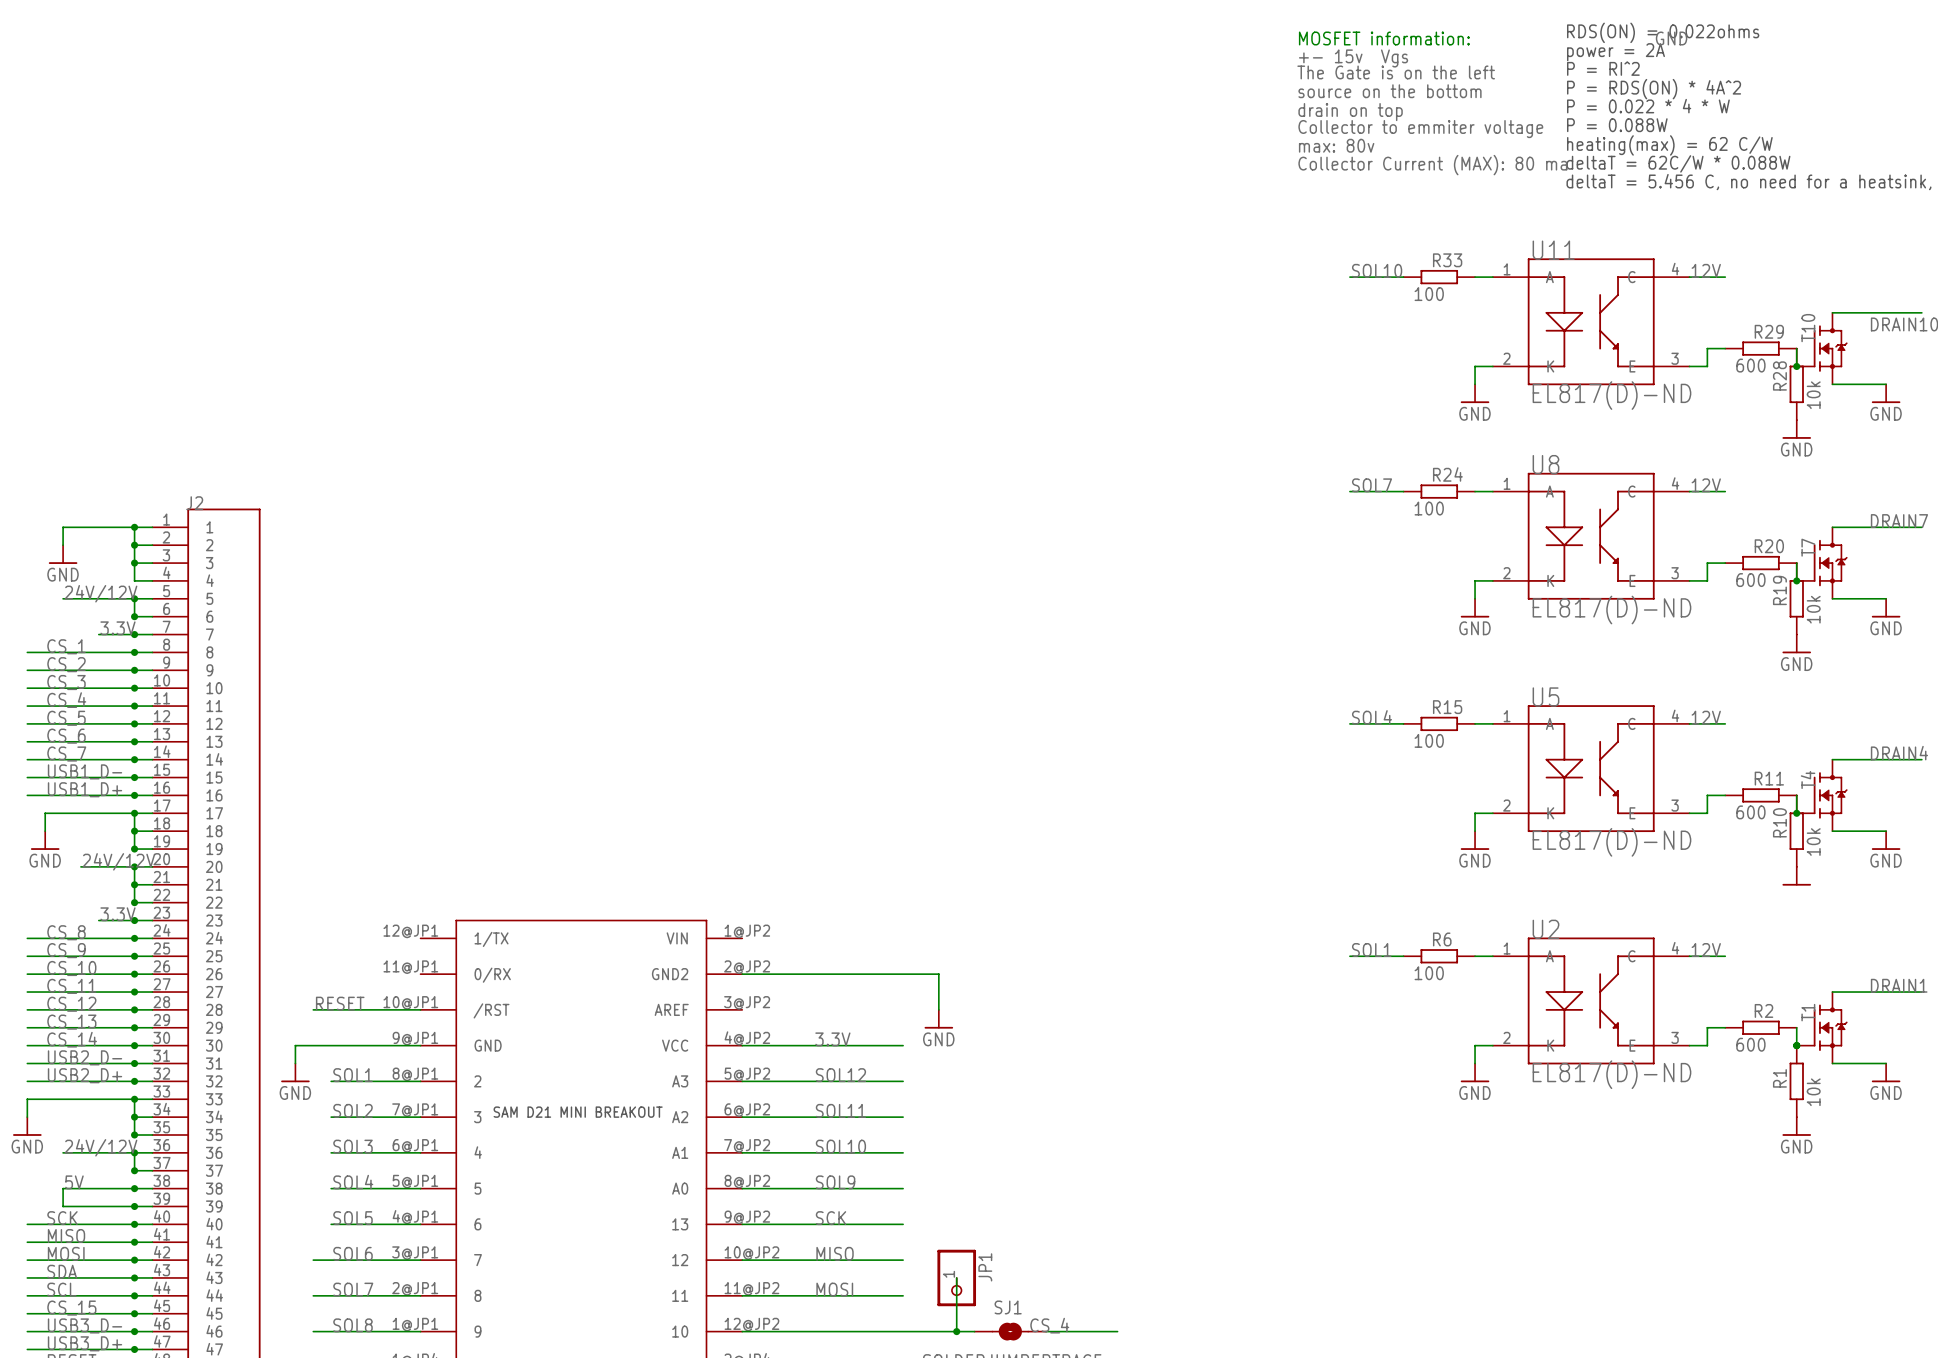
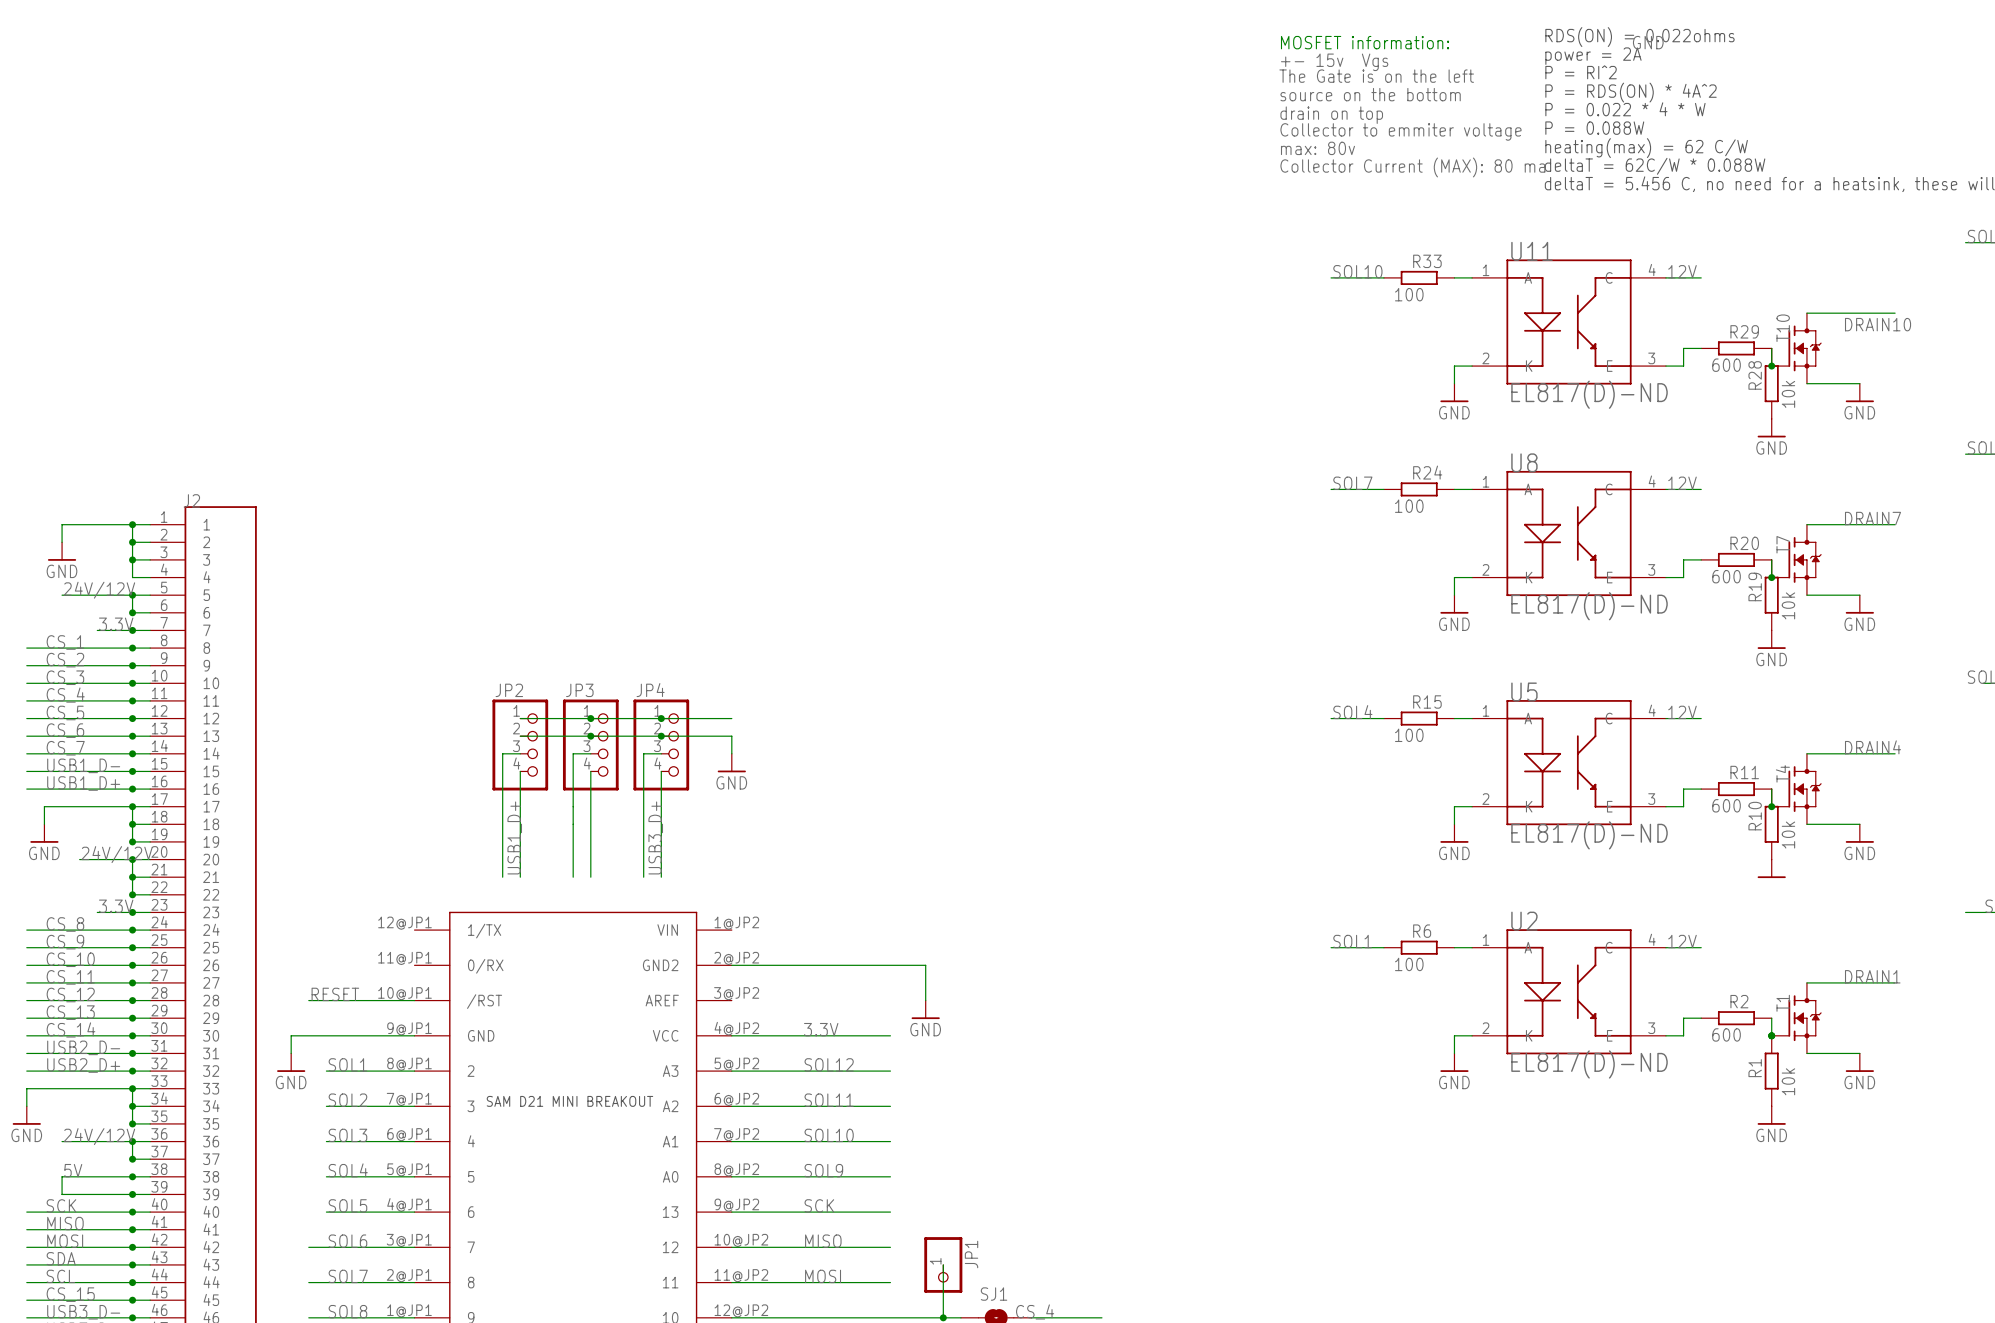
wire: none -> (520, 718) (731, 718)
junction: none -> (590, 718)
junction: none -> (661, 718)
wire: none -> (520, 736) (731, 736) (731, 753)
junction: none -> (590, 736)
junction: none -> (661, 736)
JP2: none -> (520, 745)
JP3: none -> (590, 745)
JP4: none -> (661, 745)
wire: none -> (520, 753) (502, 753) (502, 877)
wire: none -> (590, 753) (573, 753) (573, 877)
wire: none -> (661, 753) (643, 753) (643, 877)
power symbol: none -> GND (731, 763)
wire: none -> (520, 771) (520, 877)
wire: none -> (590, 771) (590, 877)
wire: none -> (661, 771) (661, 877)
label: none -> USB1_D+ (514, 837)
label: none -> USB3_D+ (655, 837)

